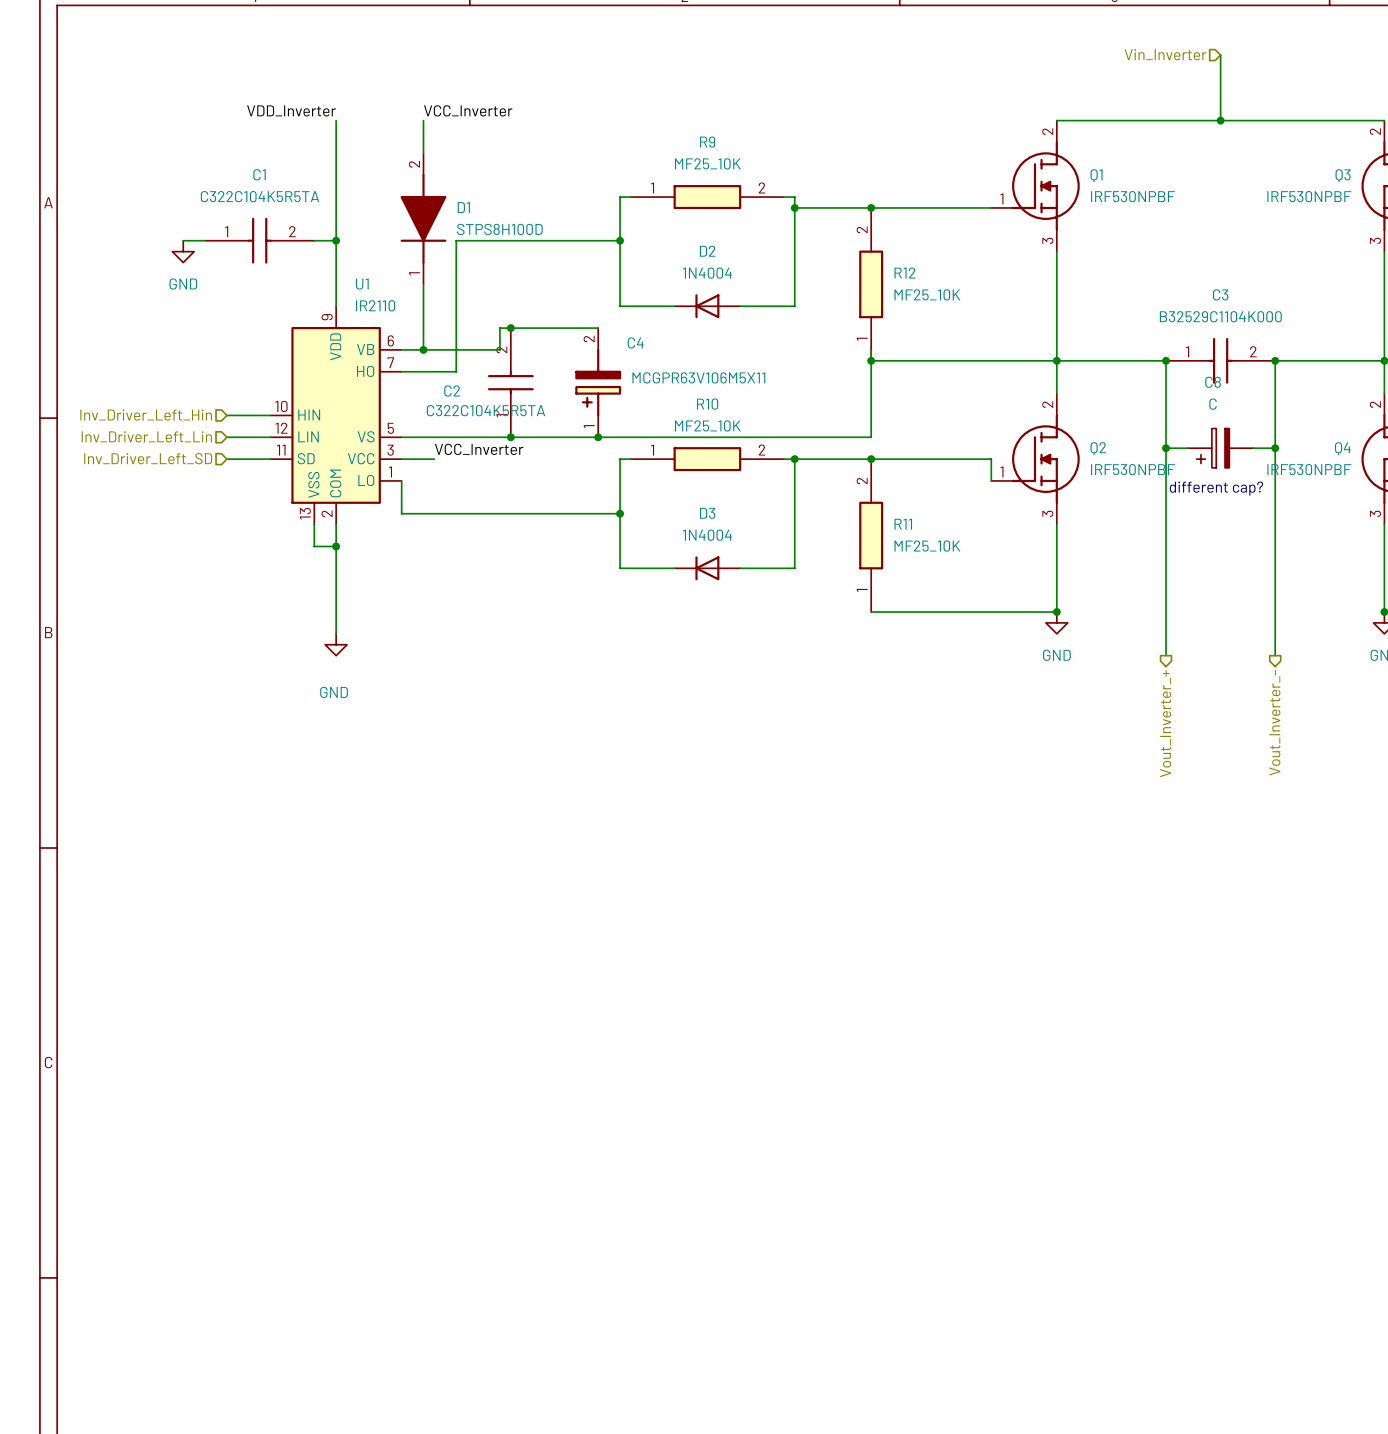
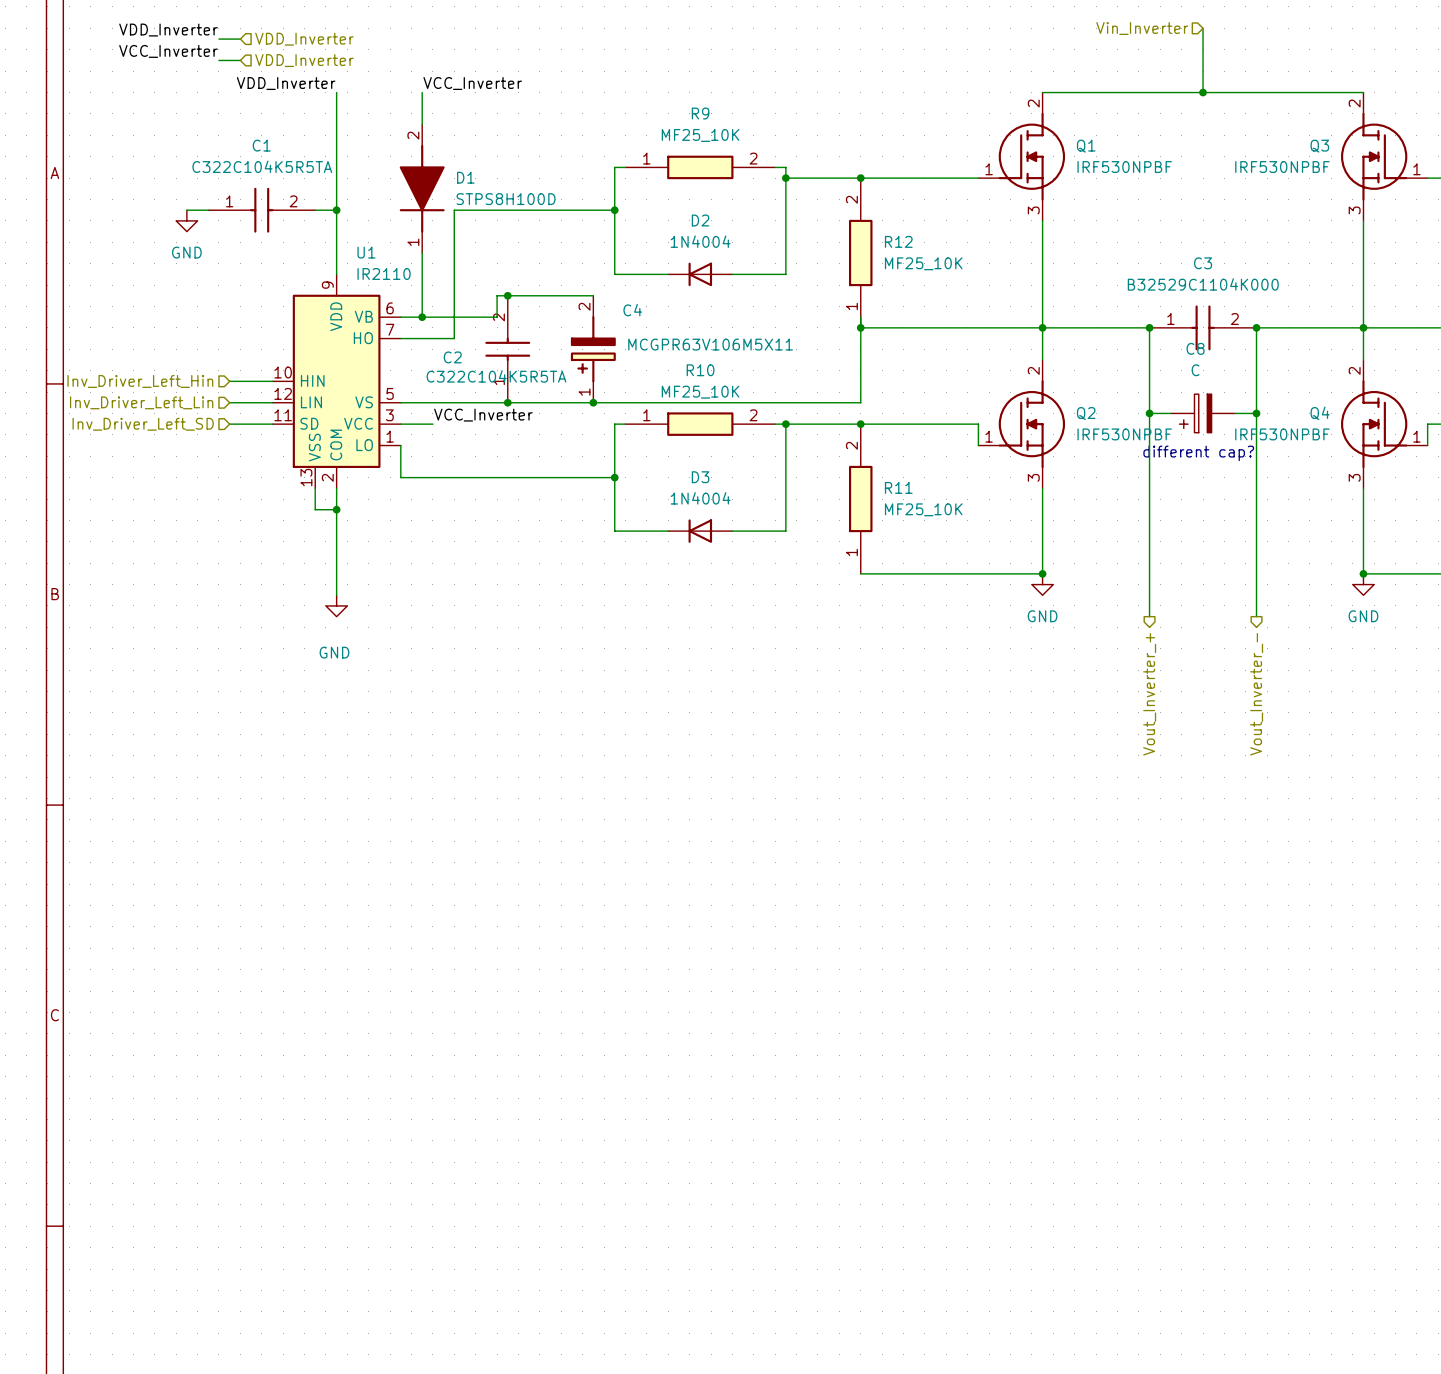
label: none -> VDD_Inverter (168, 30)
hierarchical label: none -> VDD_Inverter (304, 39)
wire: none -> (218, 39) (240, 39)
label: none -> VCC_Inverter (168, 51)
wire: none -> (218, 60) (240, 60)
hierarchical label: none -> VDD_Inverter (304, 60)

